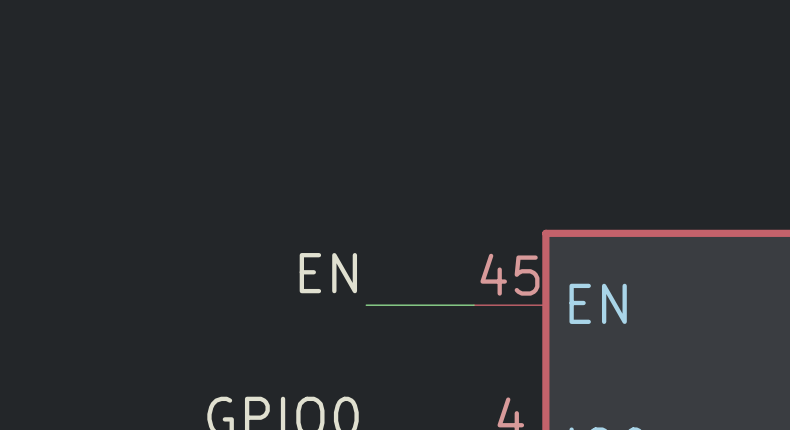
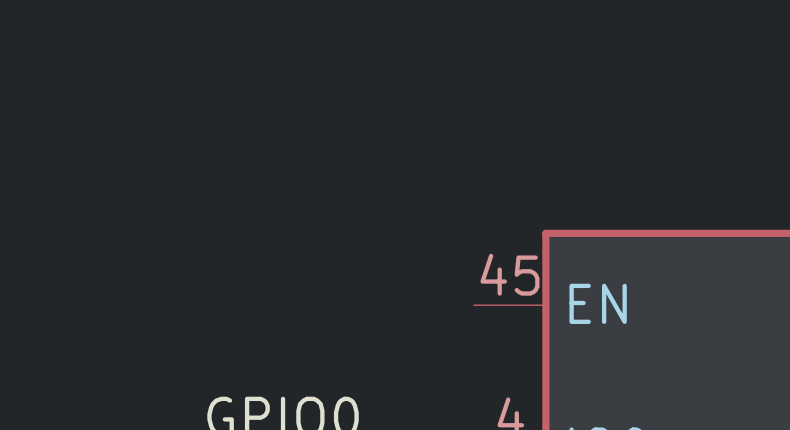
label: EN (328, 273) -> none
wire: (366, 305) (474, 305) -> none

